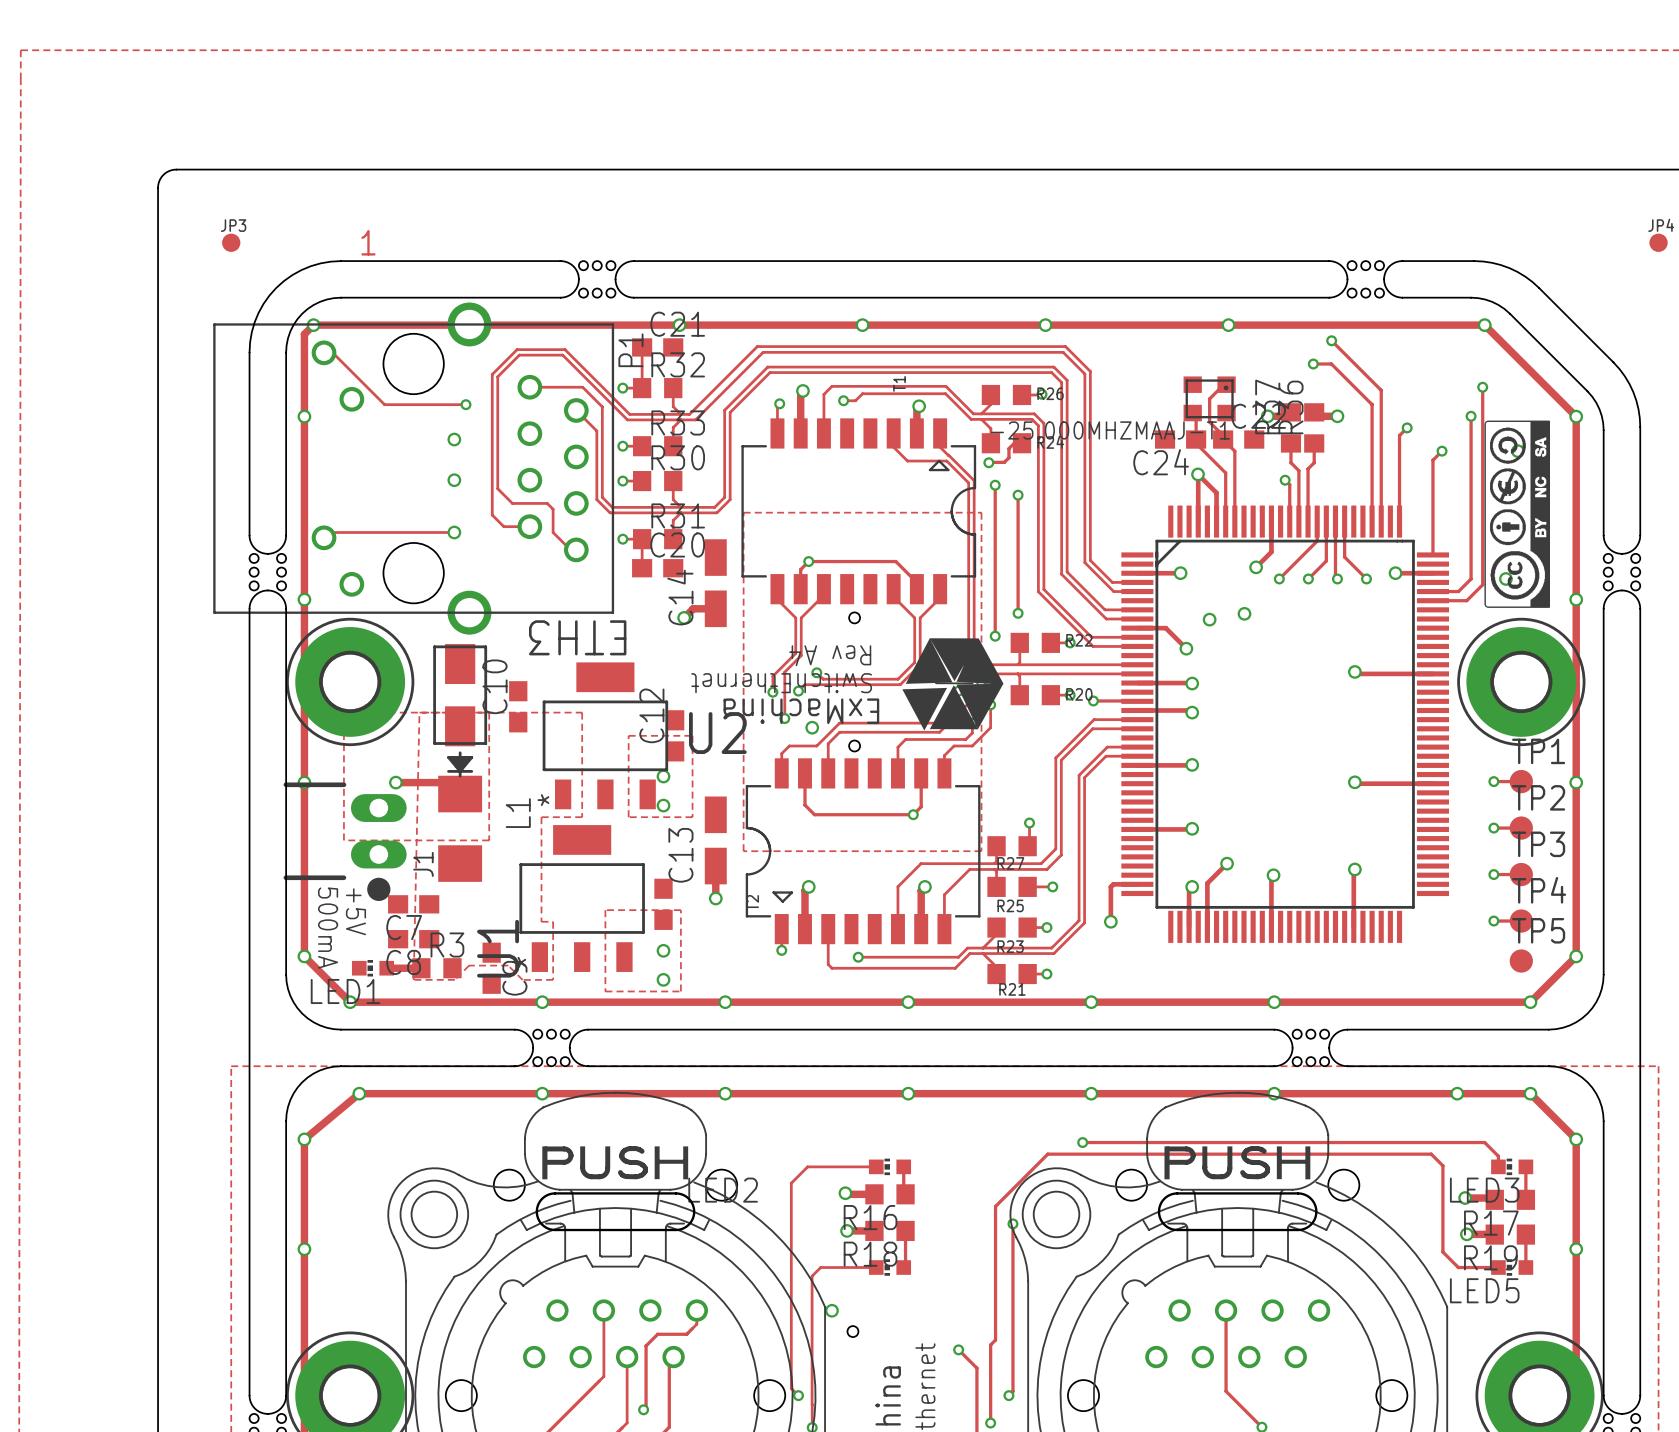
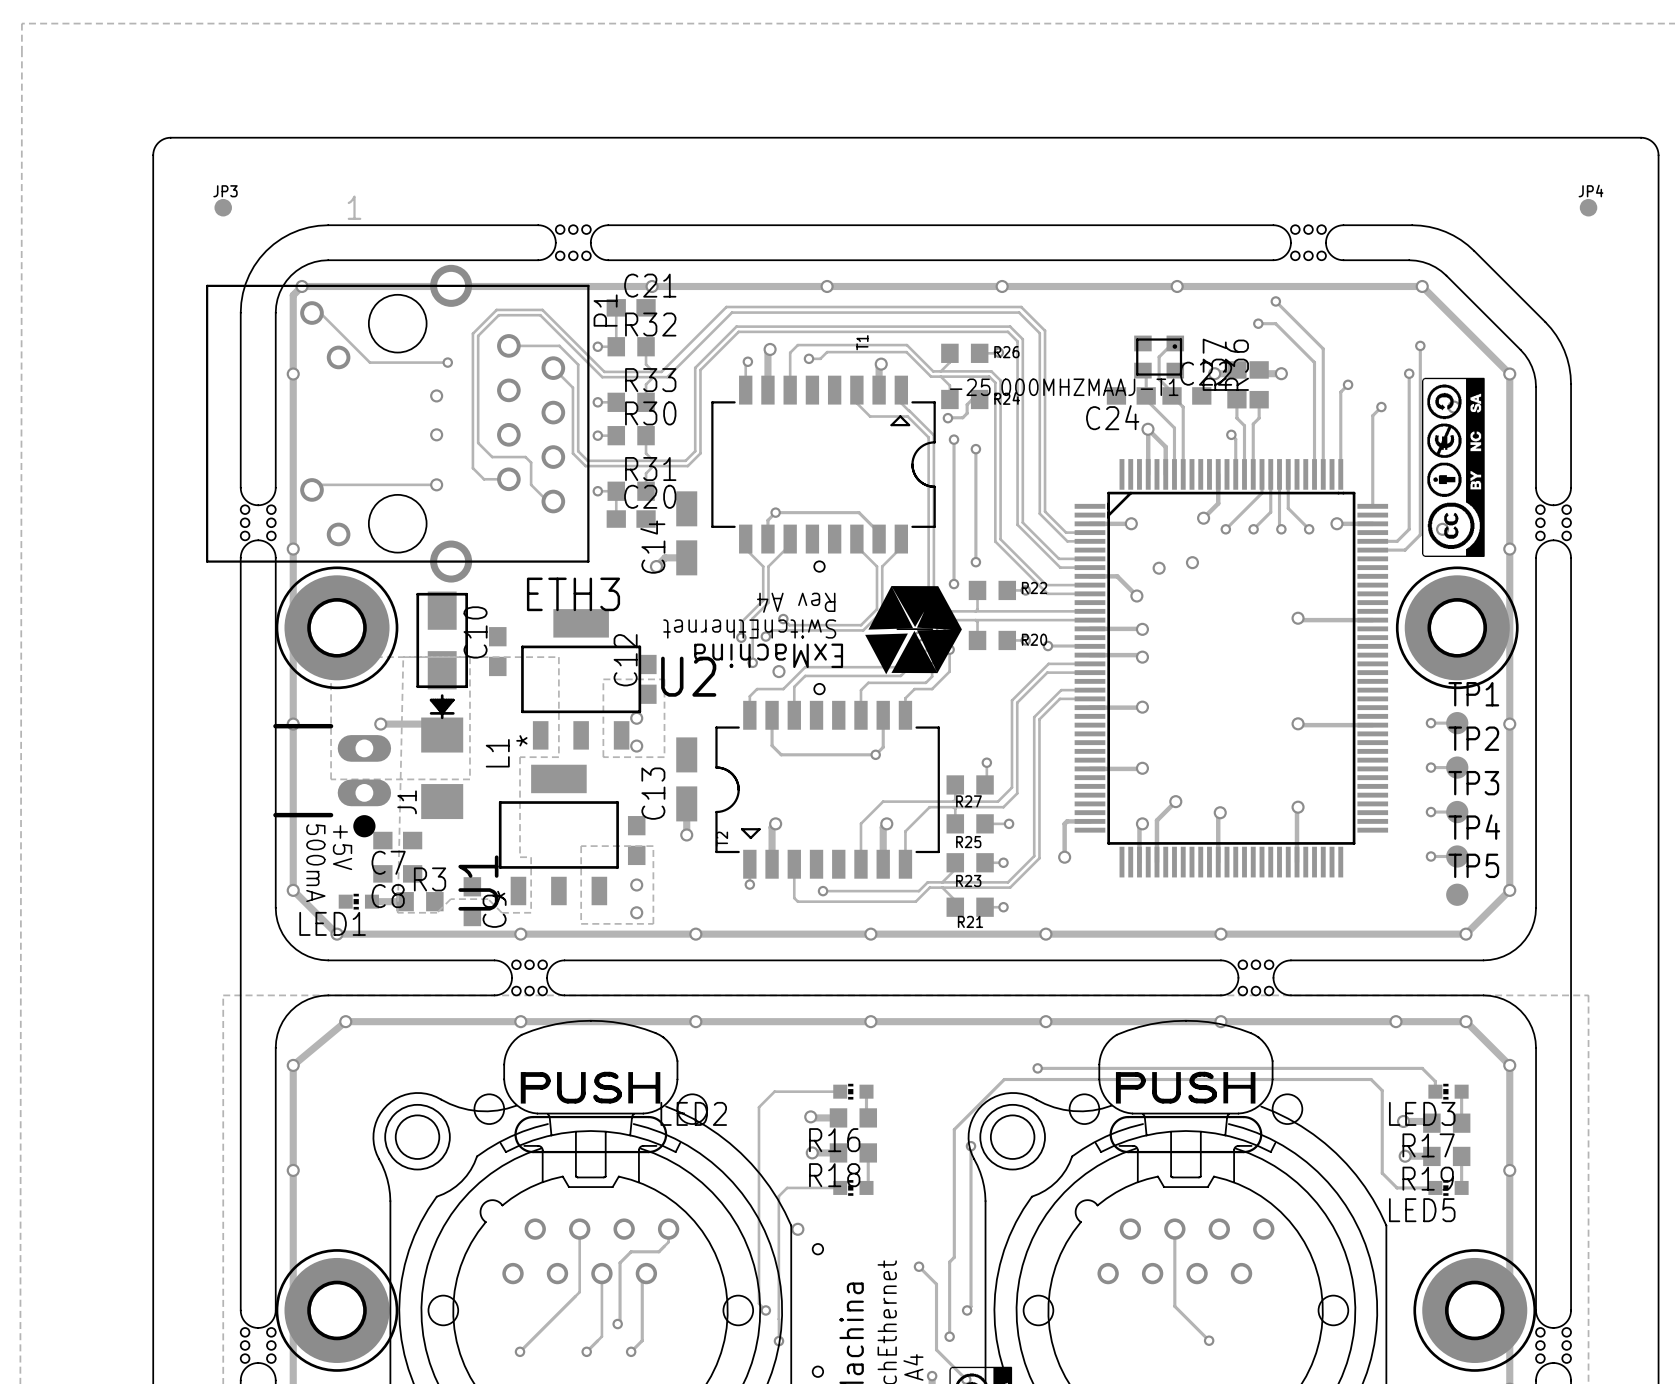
zone outline: (743, 512) (743, 851) (981, 851) (981, 512) (743, 512) -> none
text rotation: 0° (577, 637) -> 180° (573, 594)

